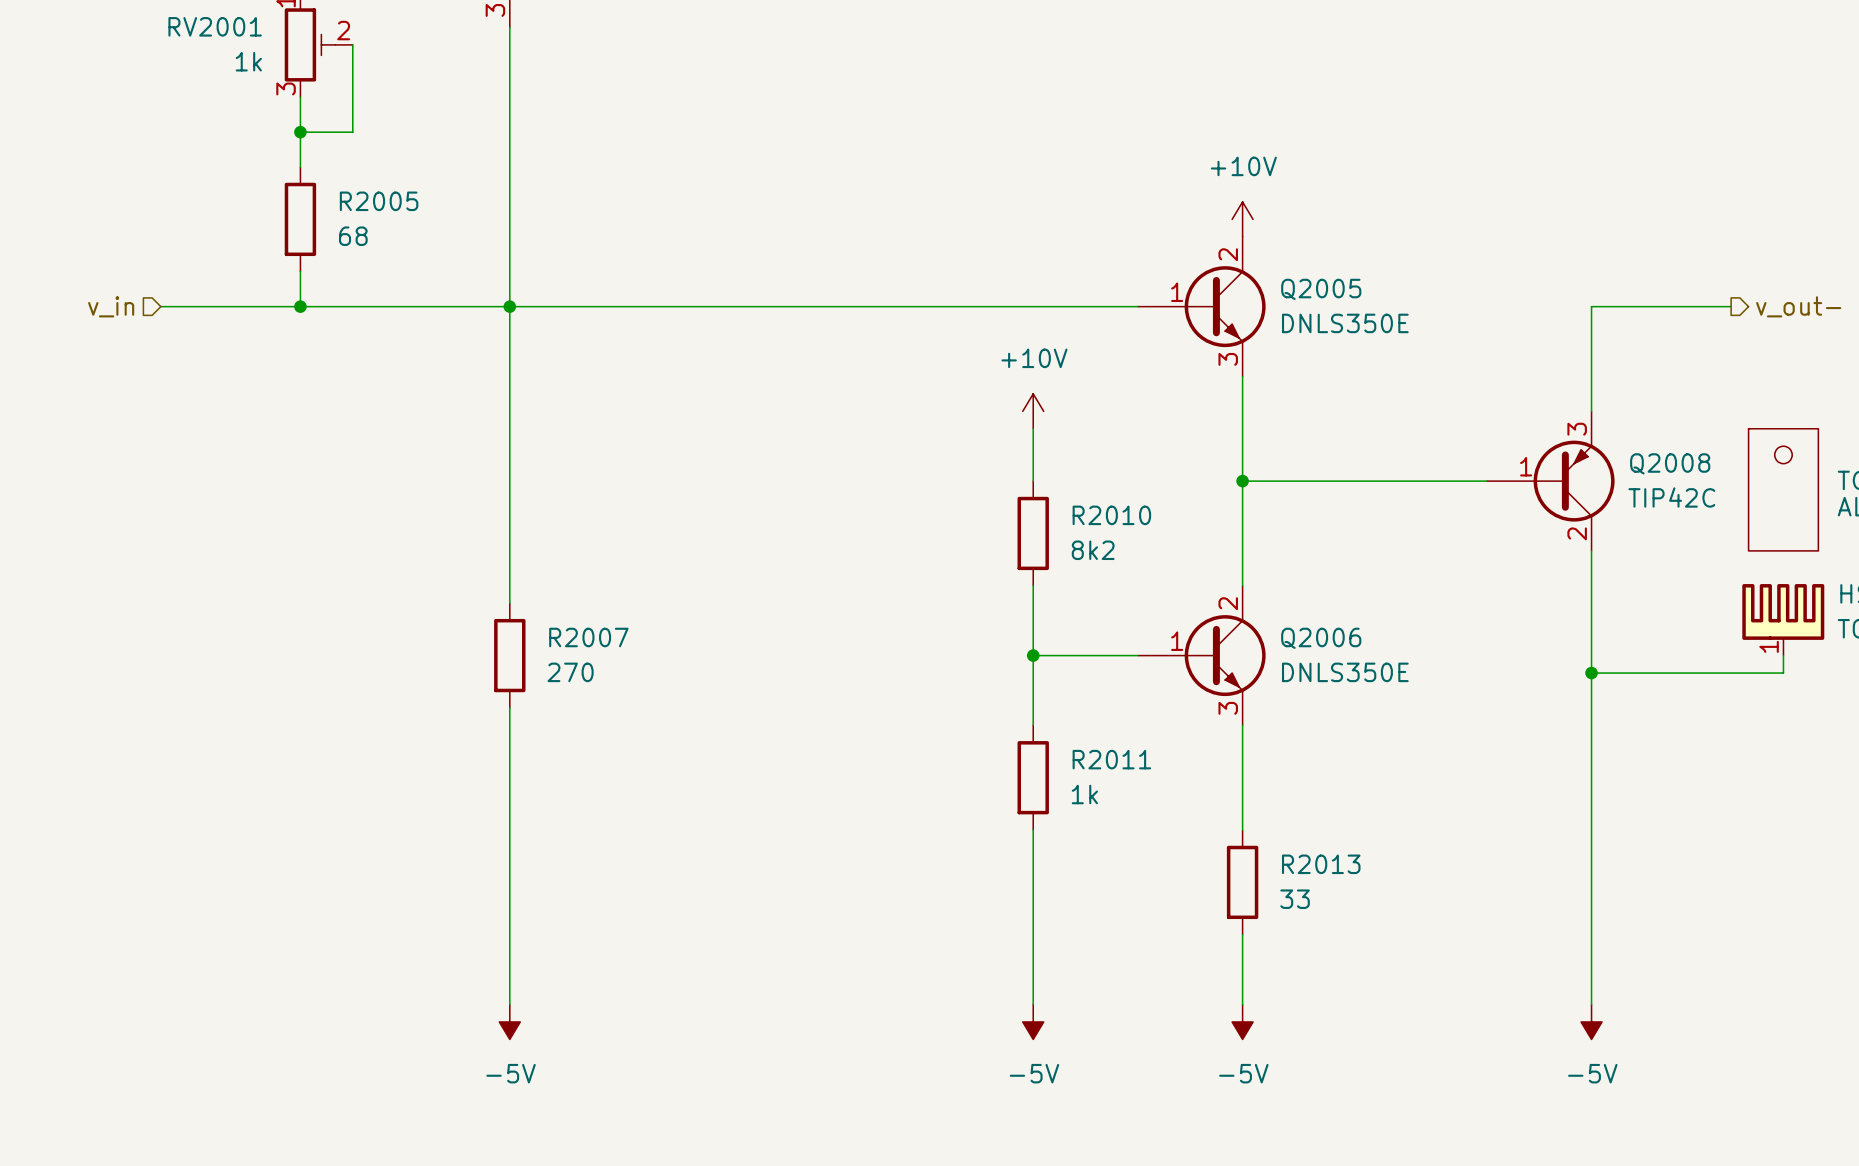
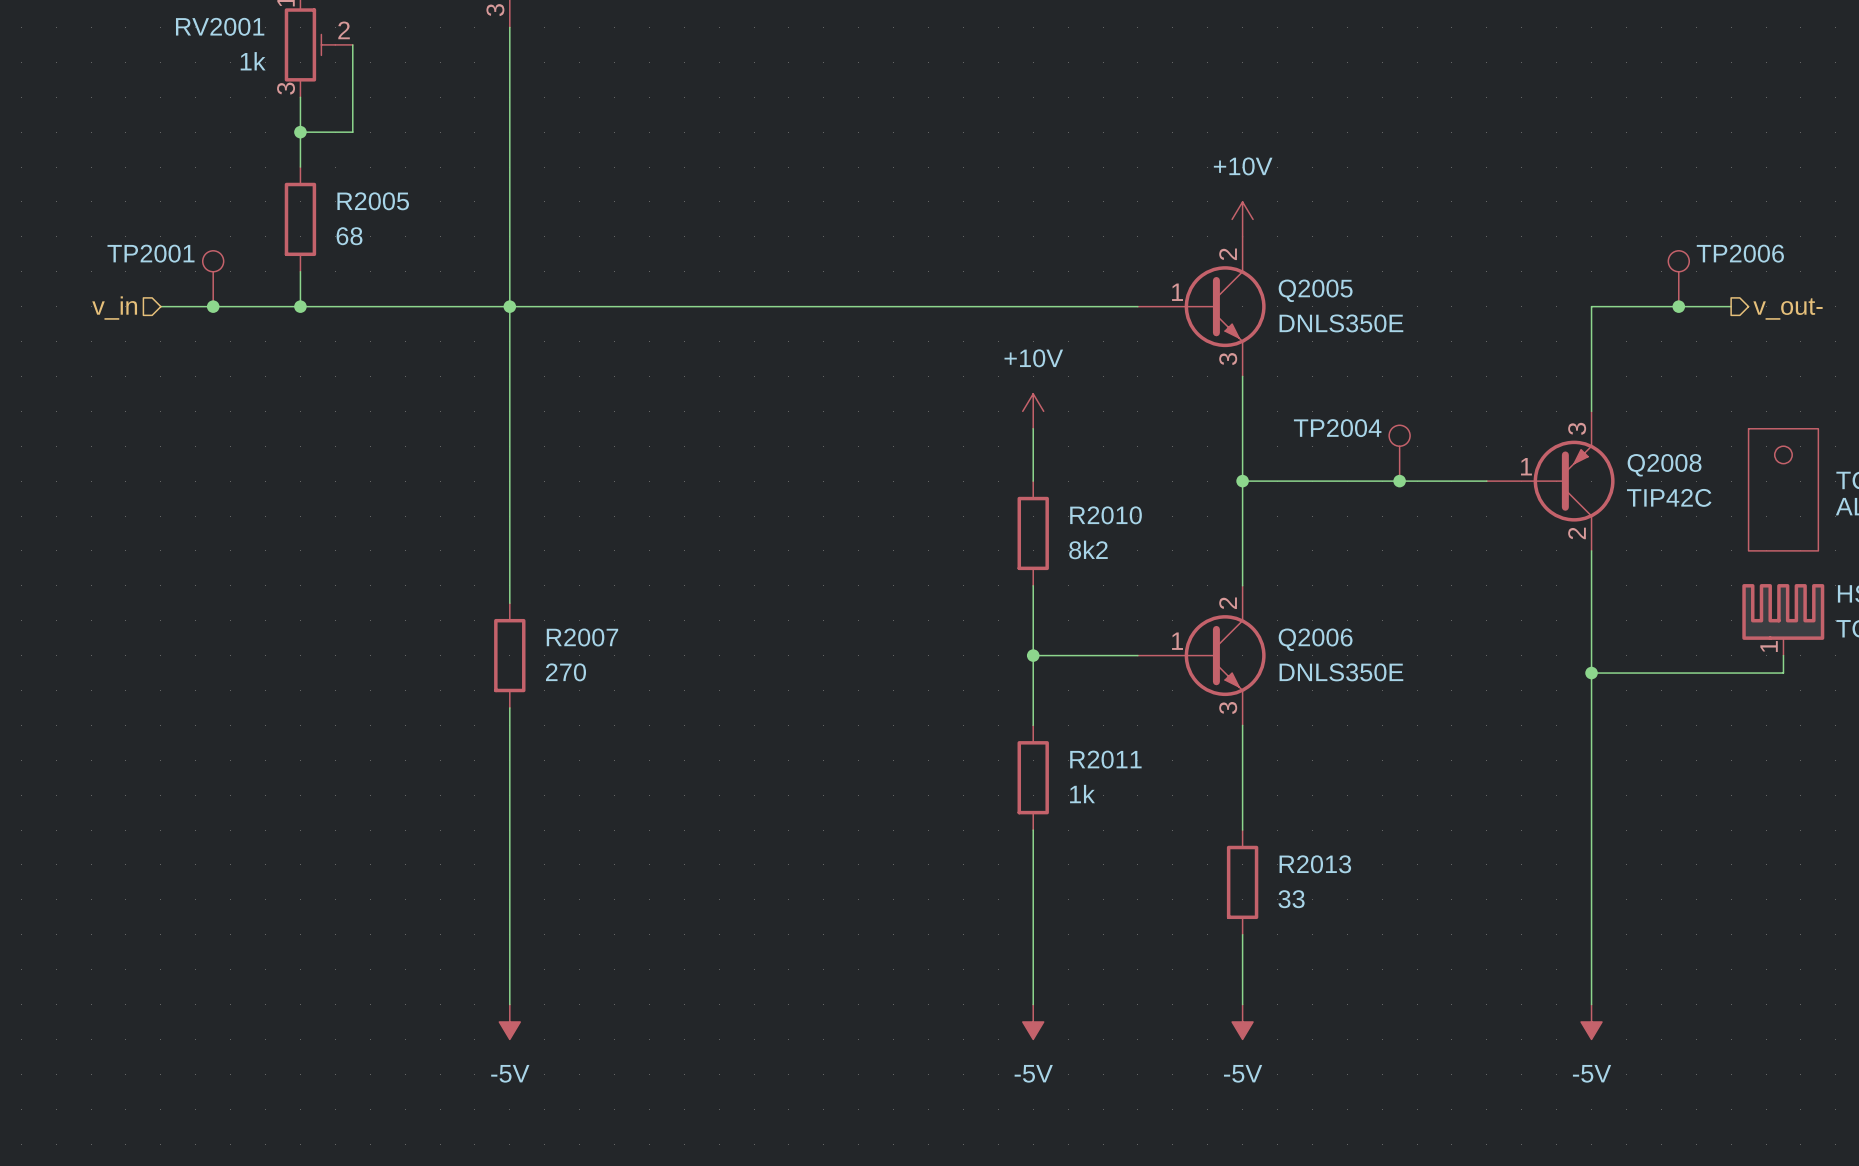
TP2001: none -> (213, 278)
TP2006: none -> (1678, 278)
junction: none -> (213, 306)
junction: none -> (1678, 306)
TP2004: none -> (1399, 453)
junction: none -> (1399, 481)

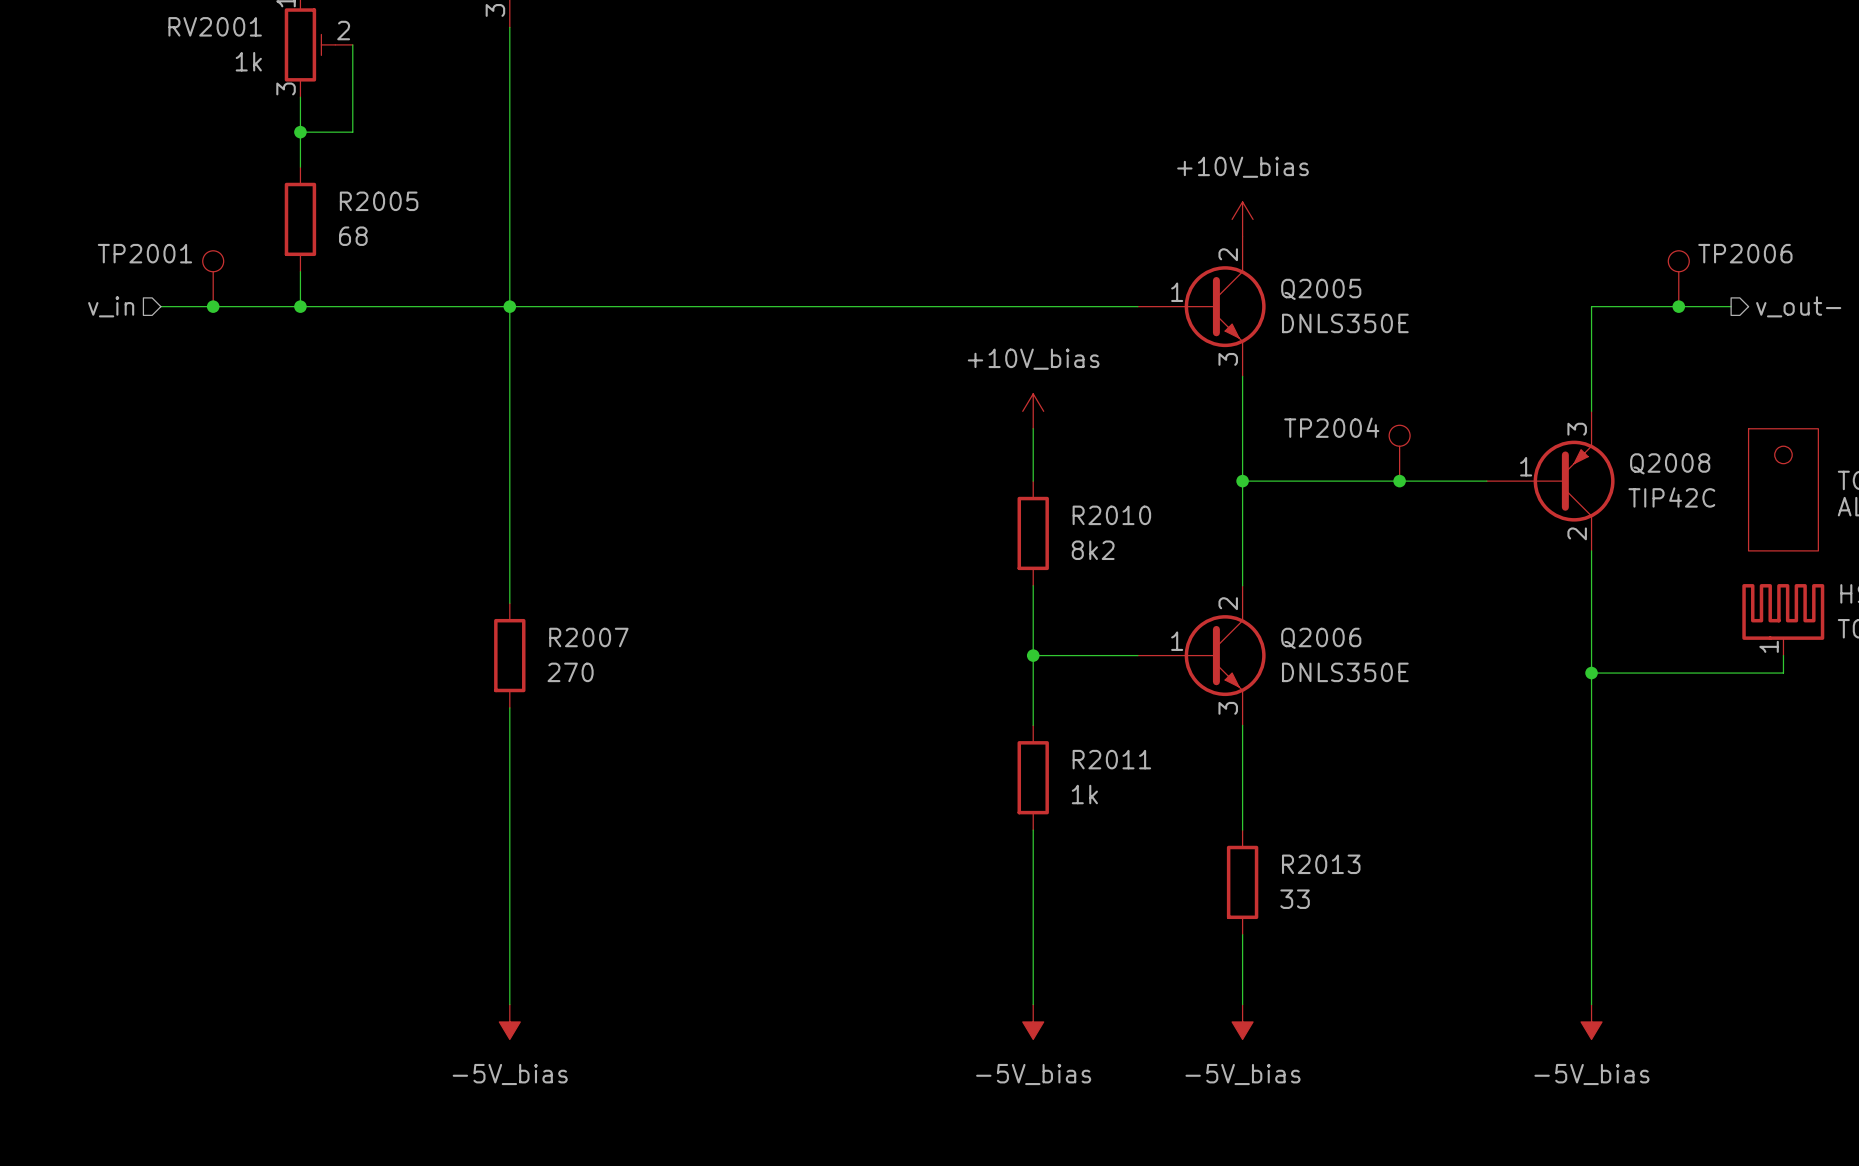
power symbol: +10V (1242, 219) -> +10V_bias (1242, 219)
power symbol: +10V (1033, 411) -> +10V_bias (1033, 411)
power symbol: -5V (509, 1021) -> -5V_bias (509, 1021)
power symbol: -5V (1033, 1021) -> -5V_bias (1033, 1021)
power symbol: -5V (1242, 1021) -> -5V_bias (1242, 1021)
power symbol: -5V (1591, 1021) -> -5V_bias (1591, 1021)

